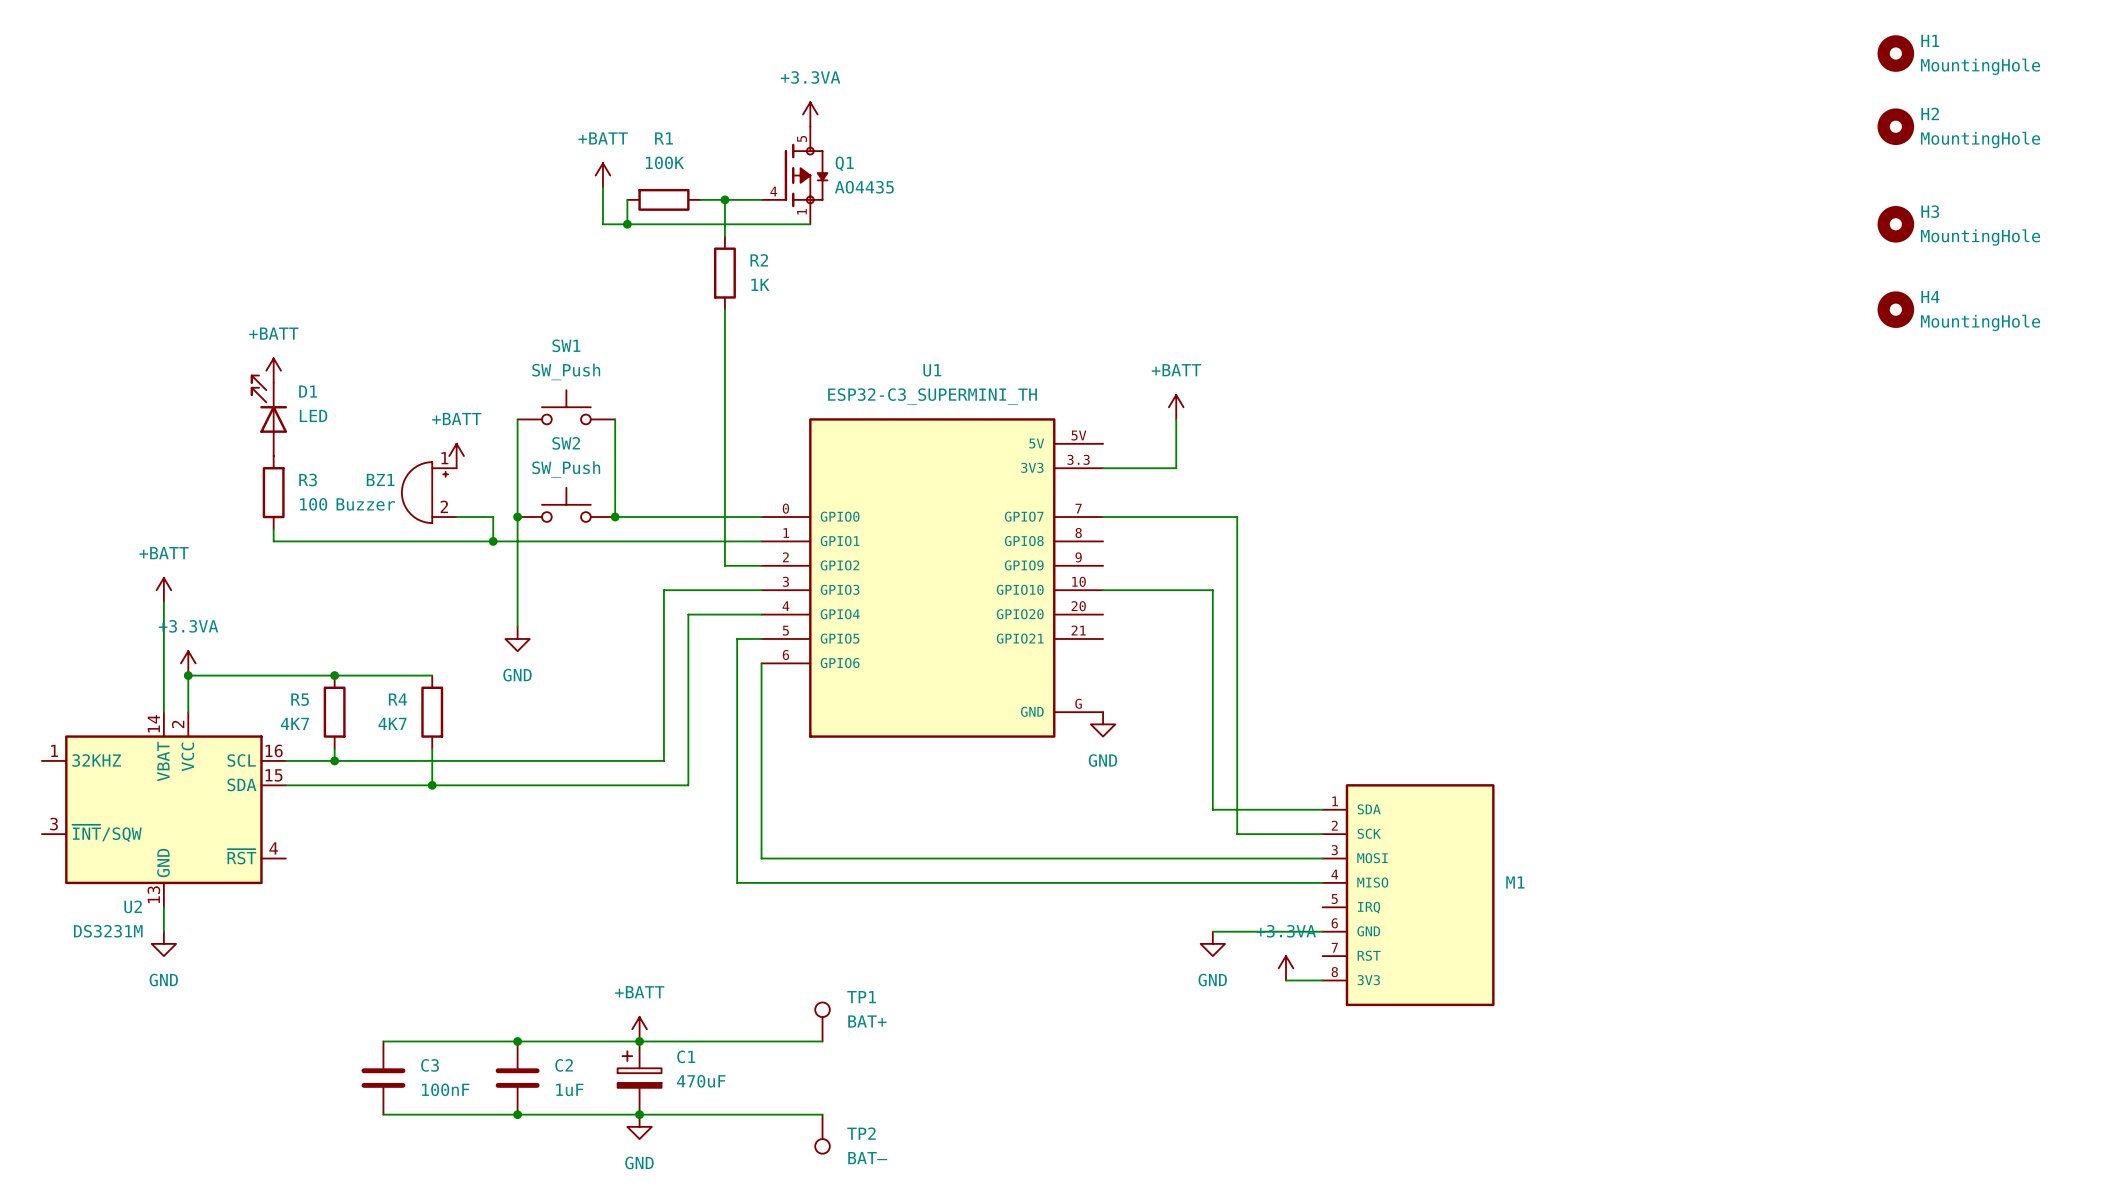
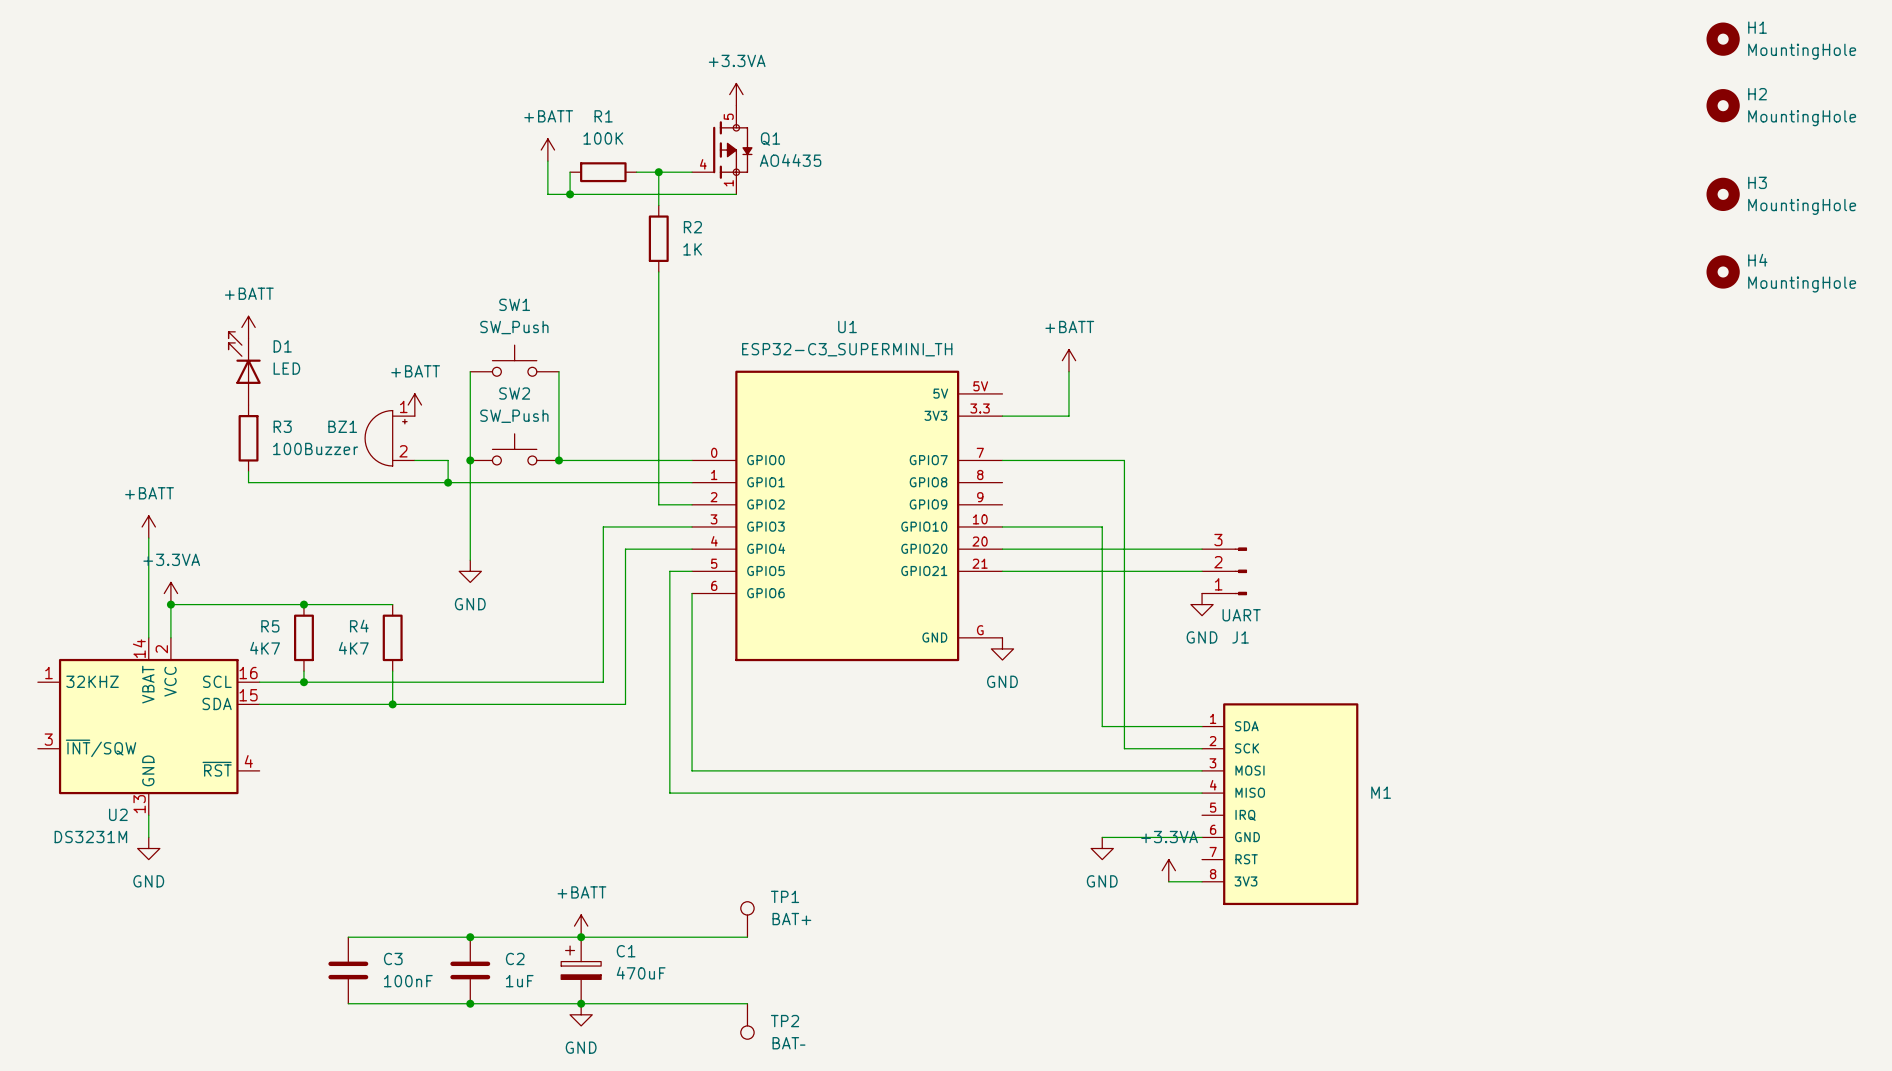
wire: none -> (1002, 549) (1202, 549)
wire: none -> (1002, 571) (1202, 571)
J1: none -> UART (1224, 571)
power symbol: none -> GND (1202, 604)

